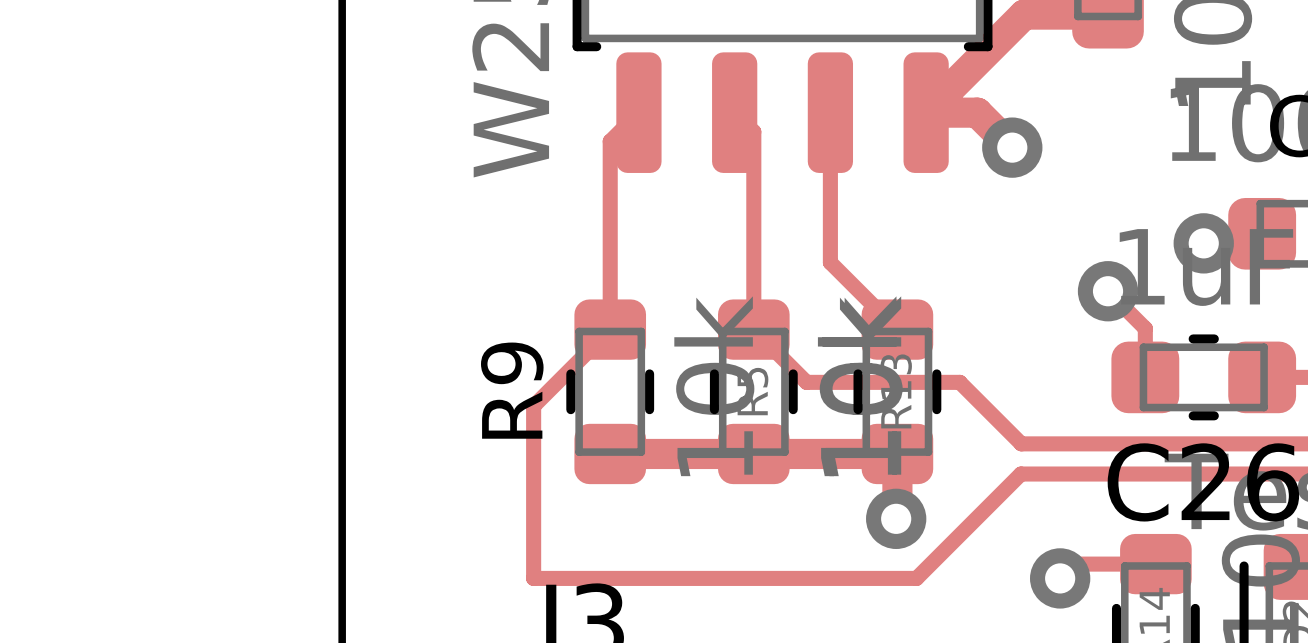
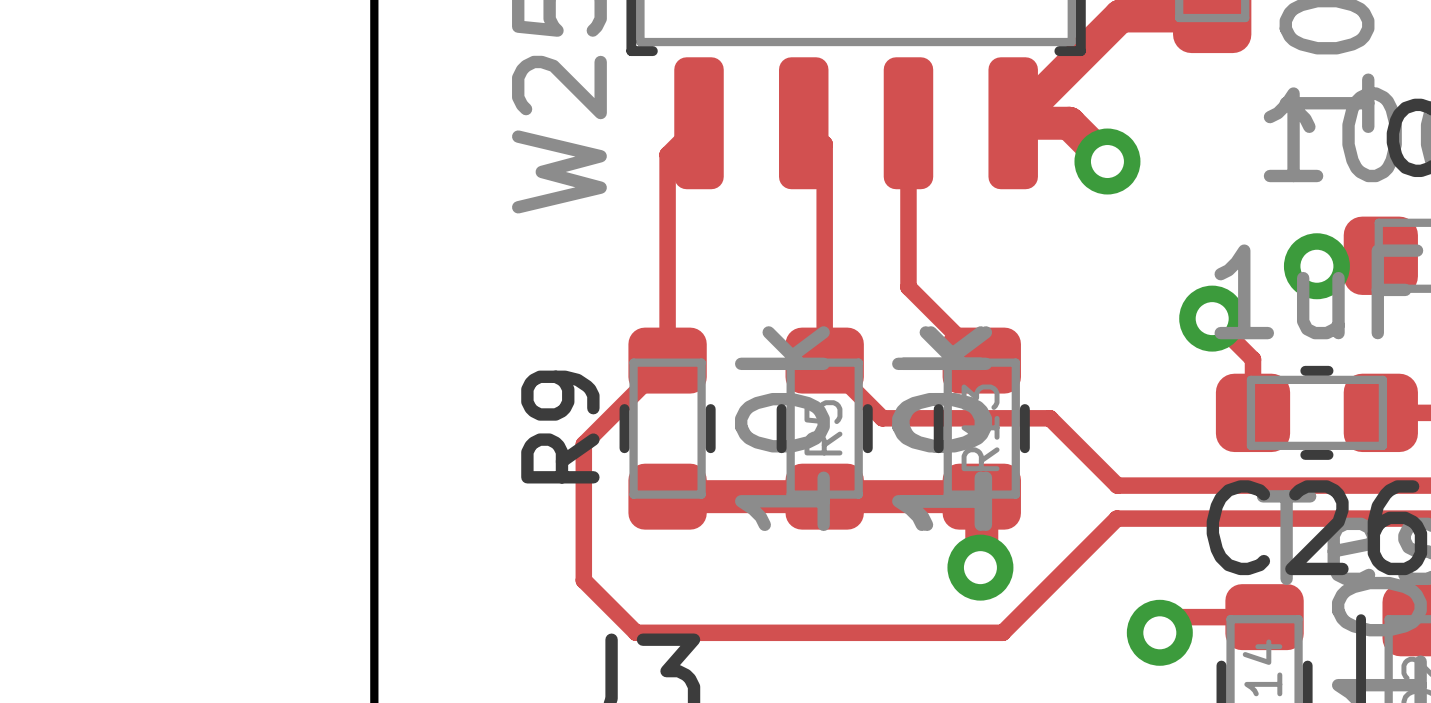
track: (533, 530) (533, 578) (581, 578) -> (583, 580) (636, 632)

